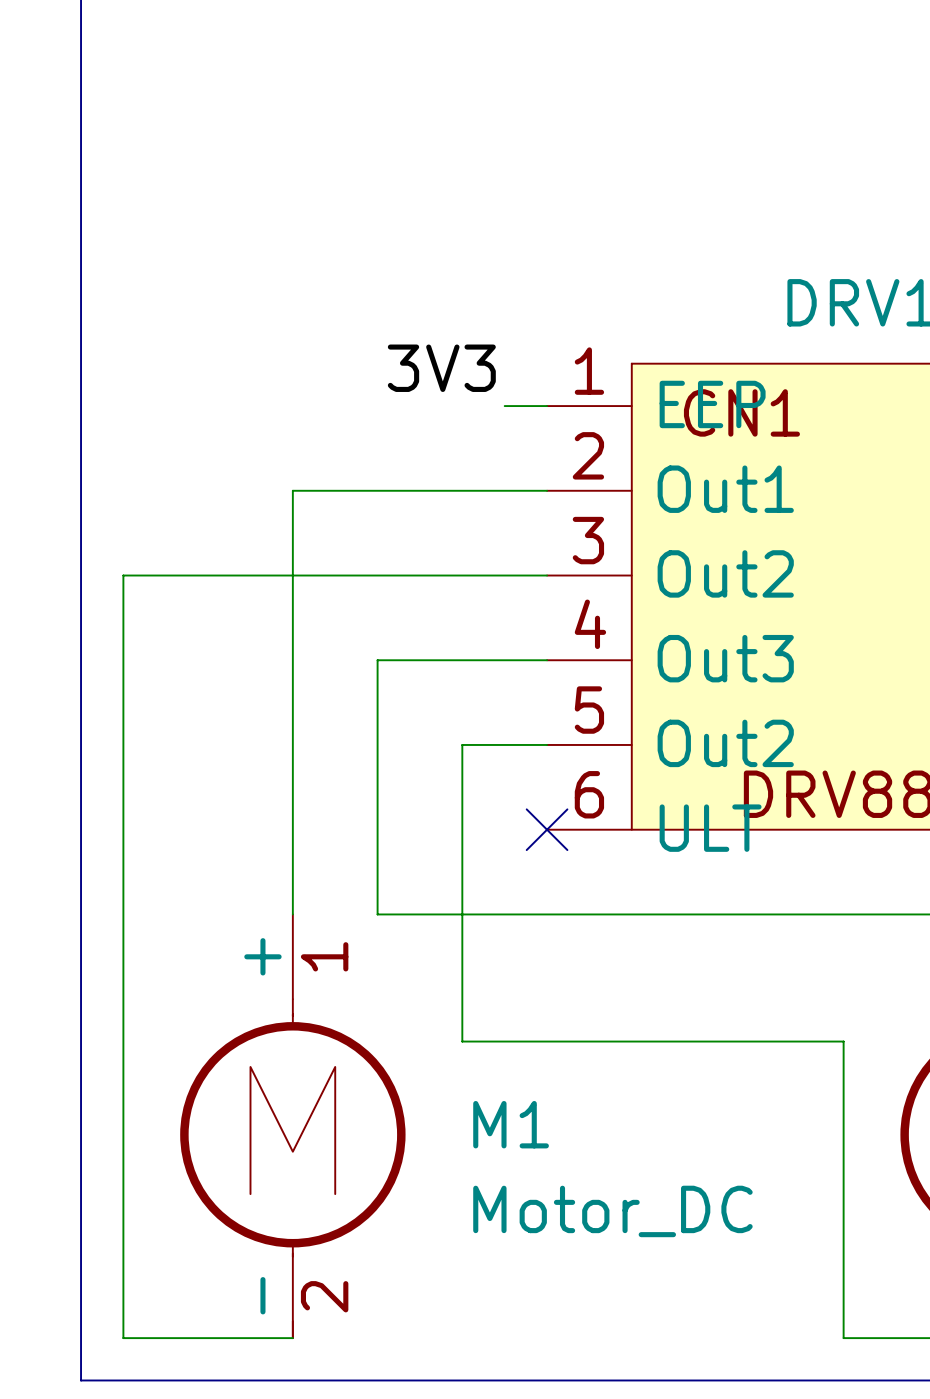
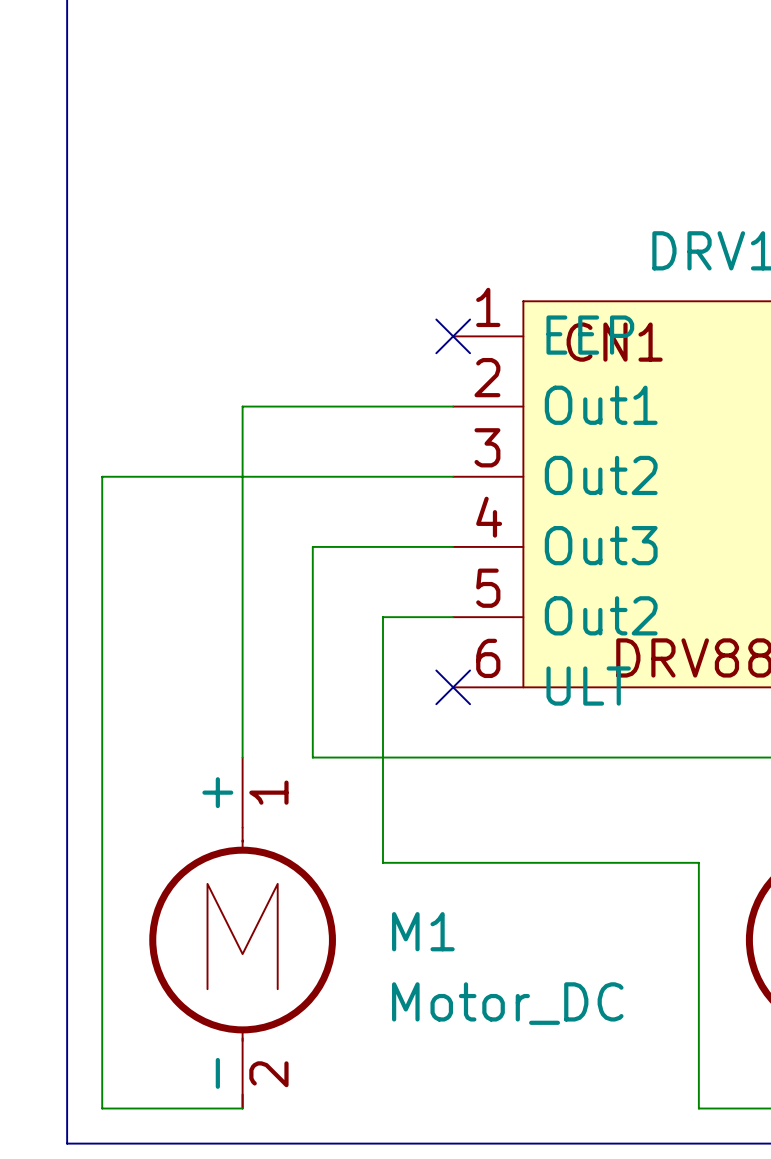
label: 3V3 (441, 368) -> none
wire: (504, 406) (547, 406) -> none
no-connect mark: none -> (453, 336)

